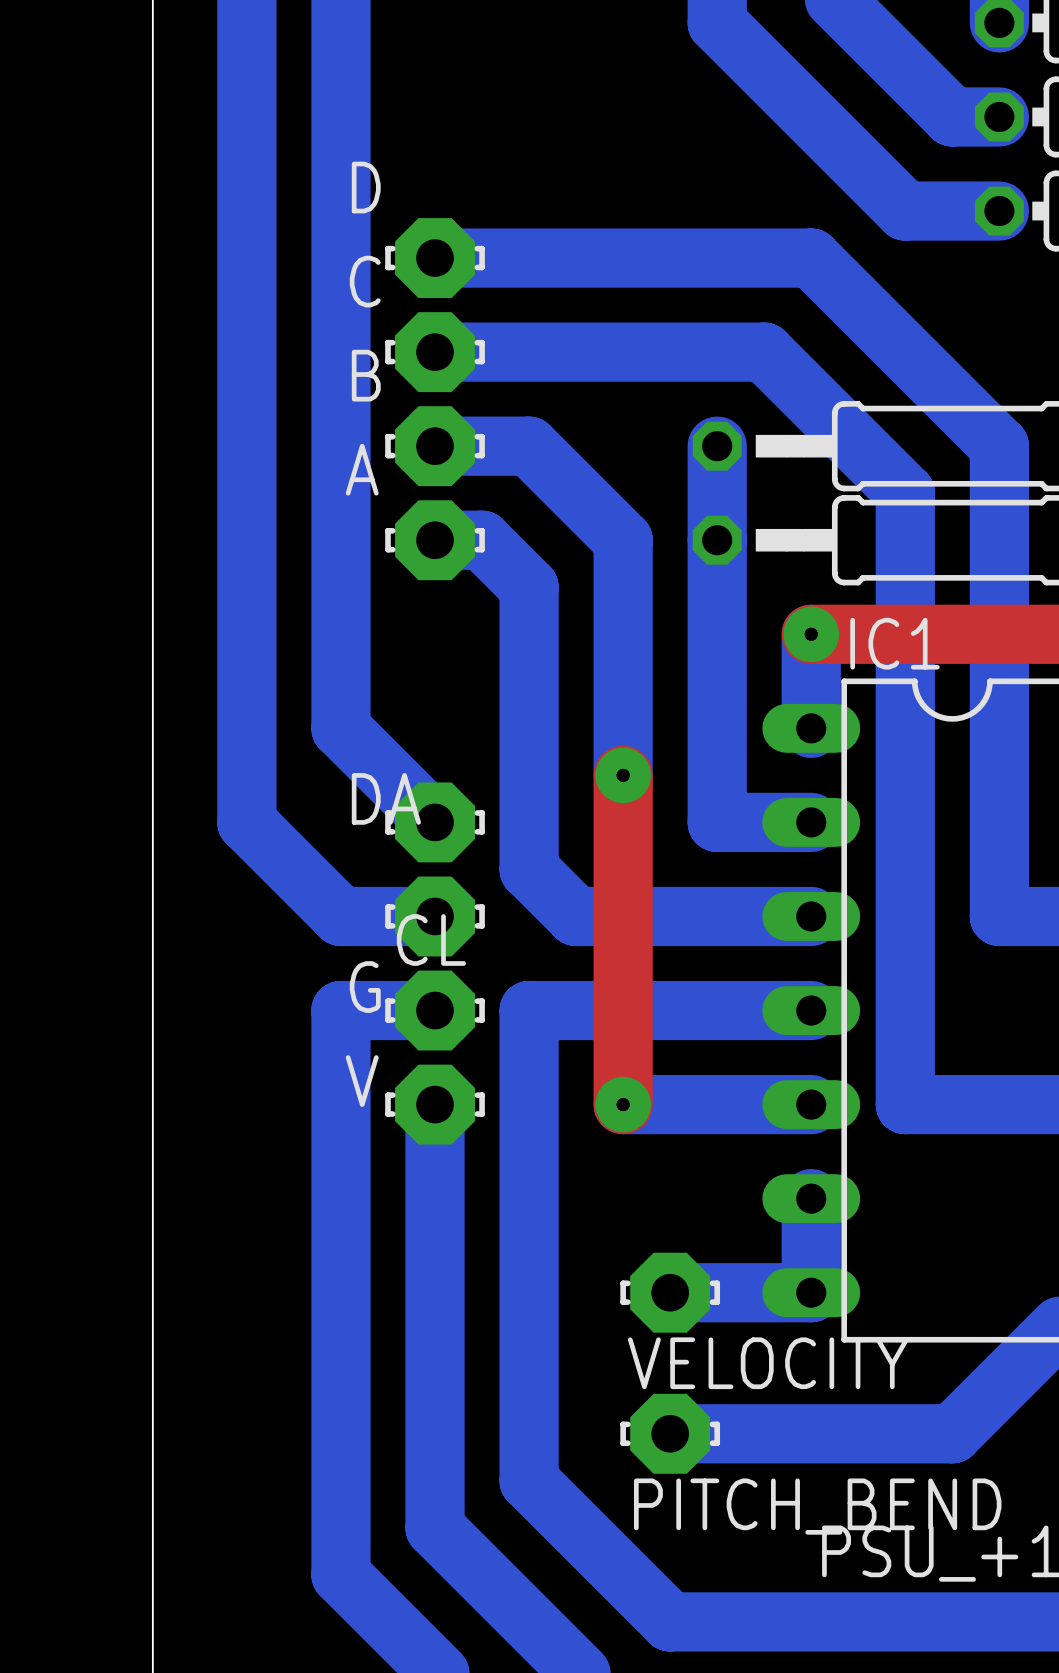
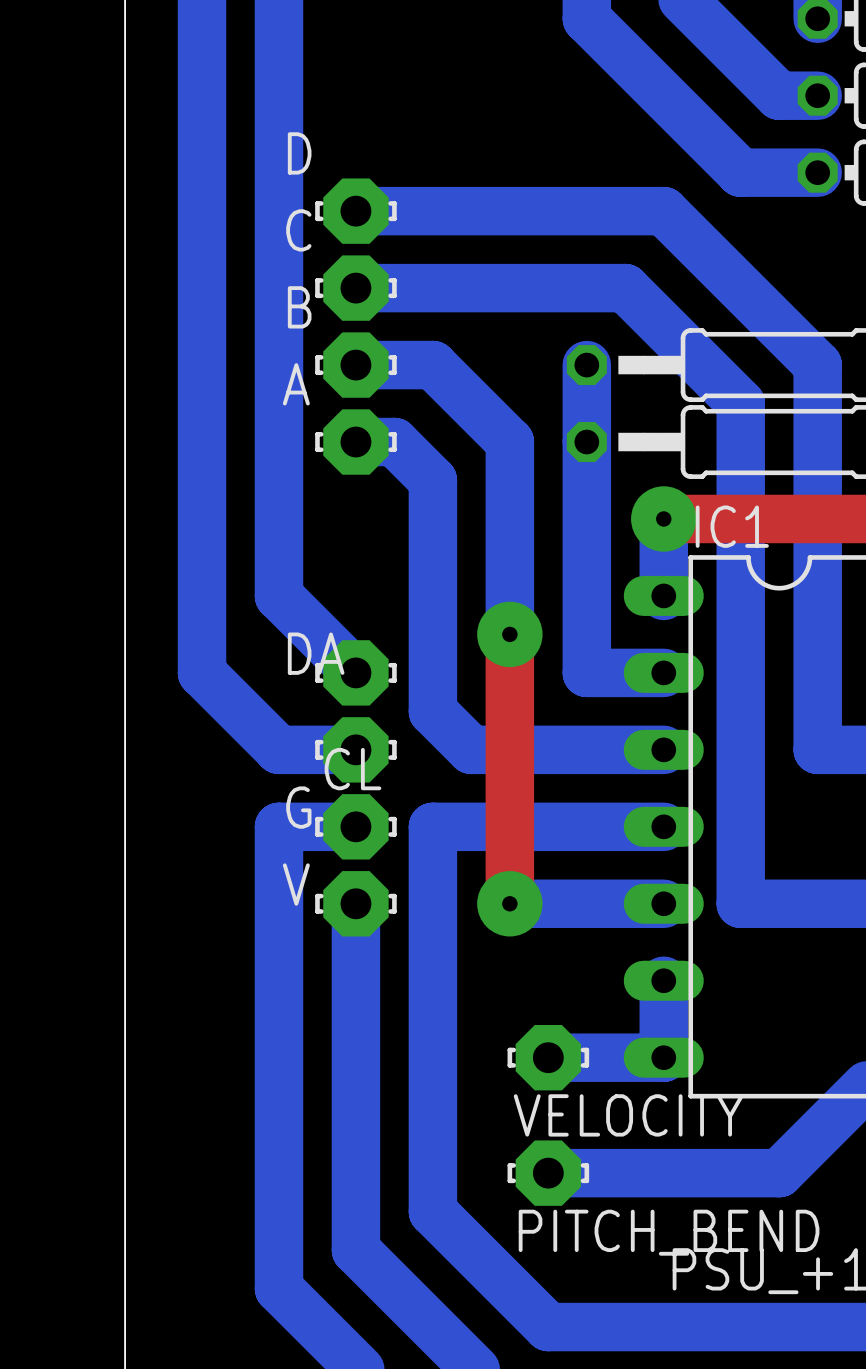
via size: [783, 606, 840, 663] -> [631, 486, 697, 552]
via size: [595, 747, 651, 804] -> [477, 601, 543, 668]
via size: [595, 1076, 651, 1133] -> [477, 871, 543, 937]

